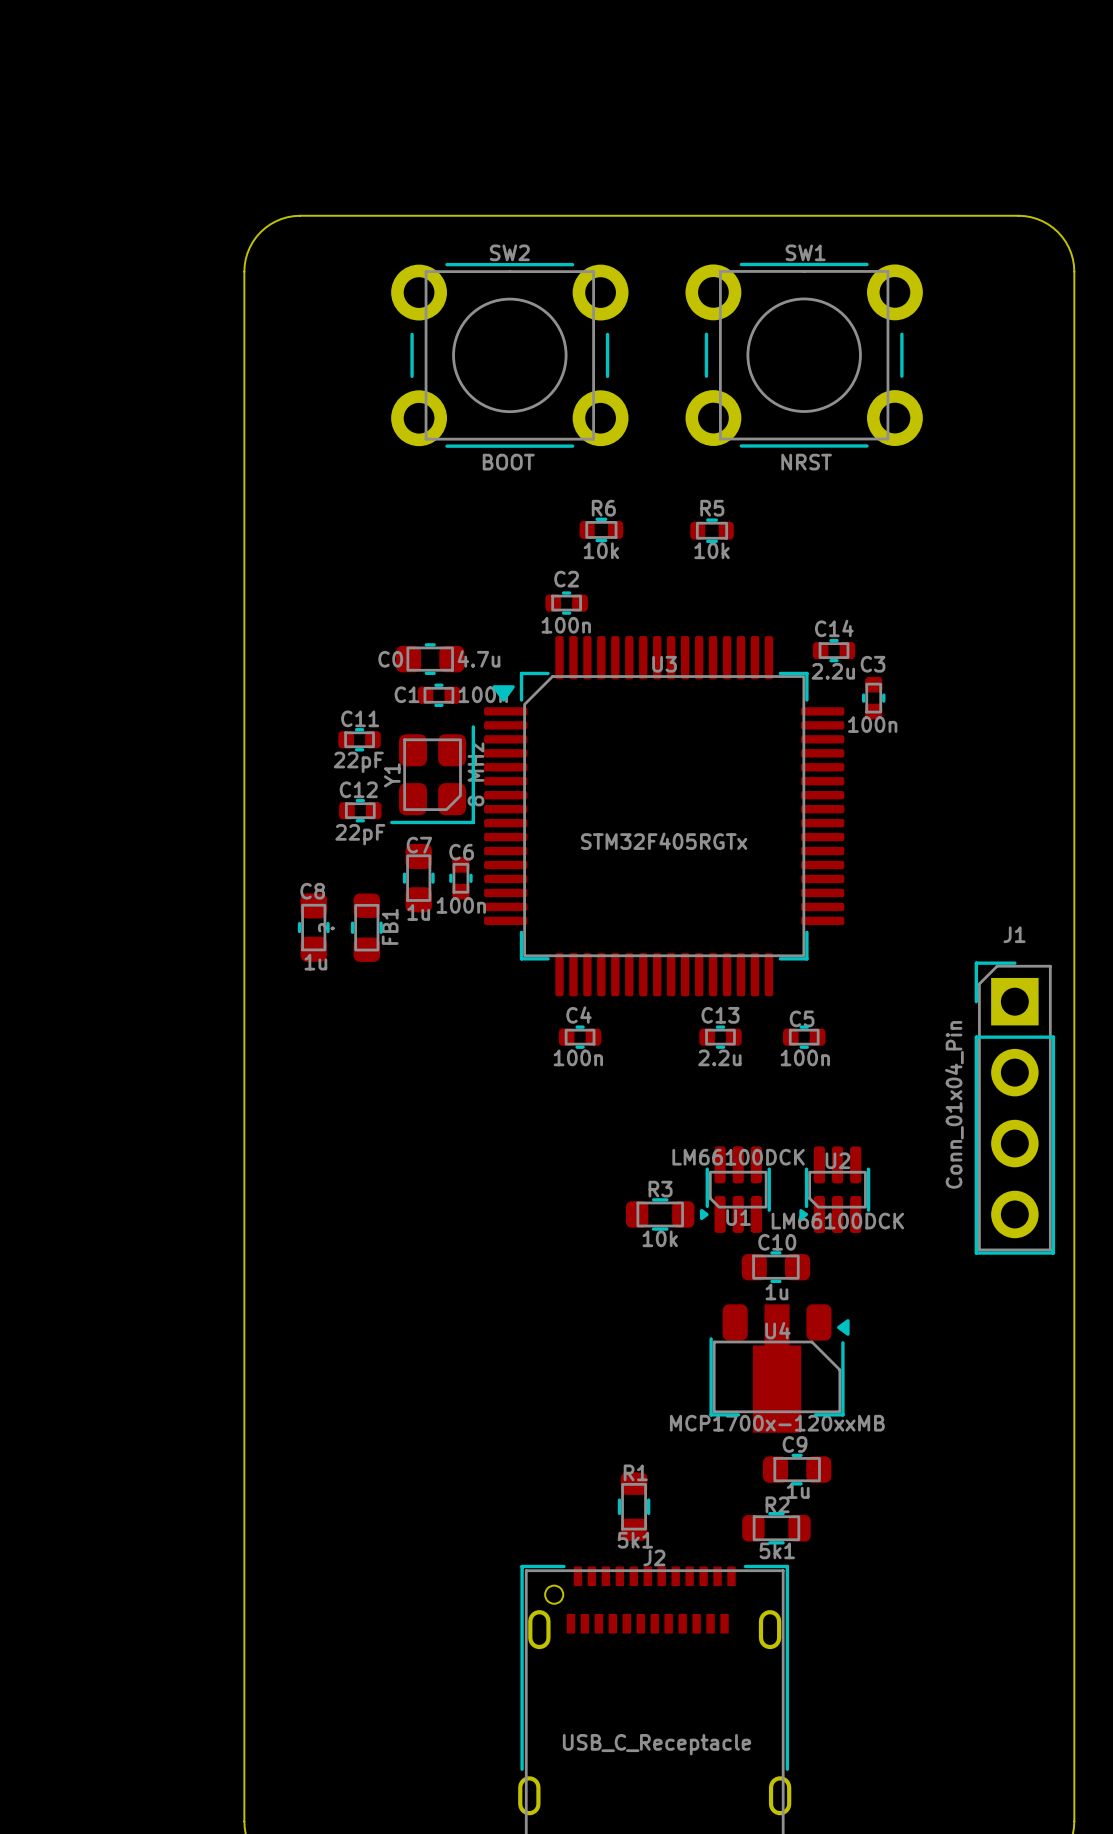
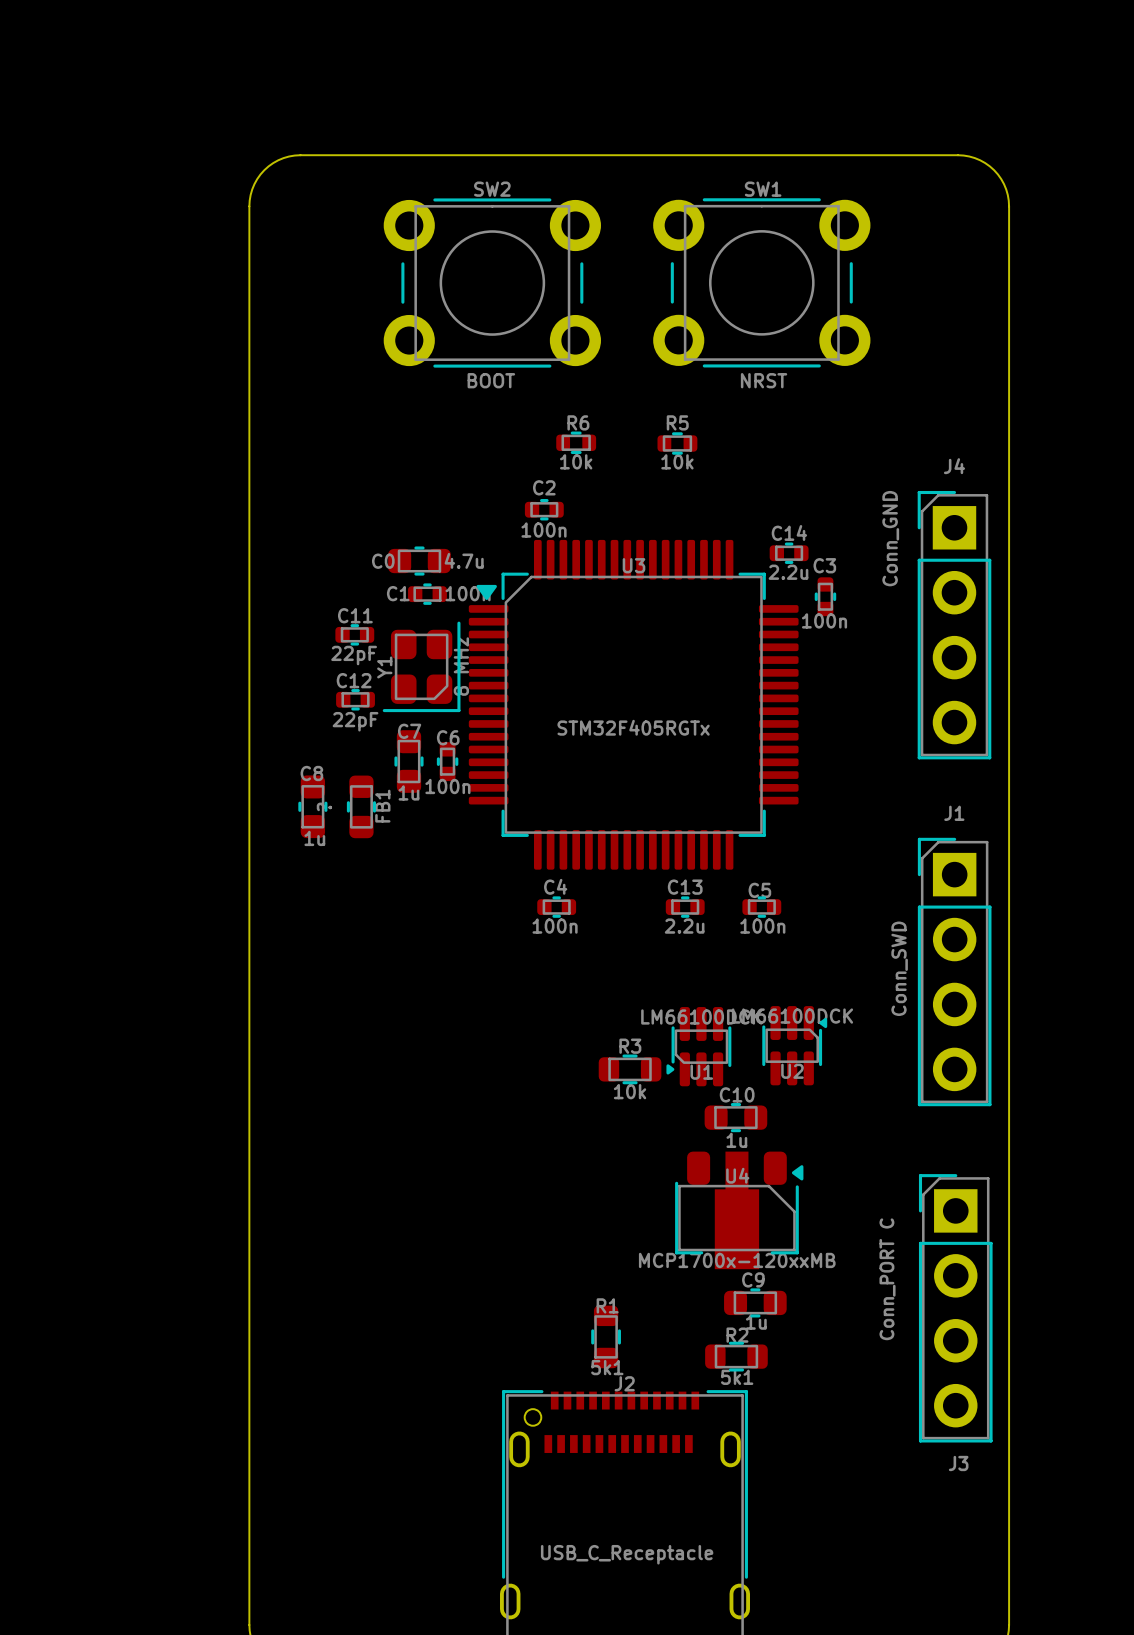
J4: none -> Conn_GND (954, 625)
J1 value: Conn_01x04_Pin (954, 1104) -> Conn_SWD (899, 968)
U2 rotation: 0° (834, 1189) -> 180° (794, 1045)
J3: none -> Conn_PORT C (955, 1308)

